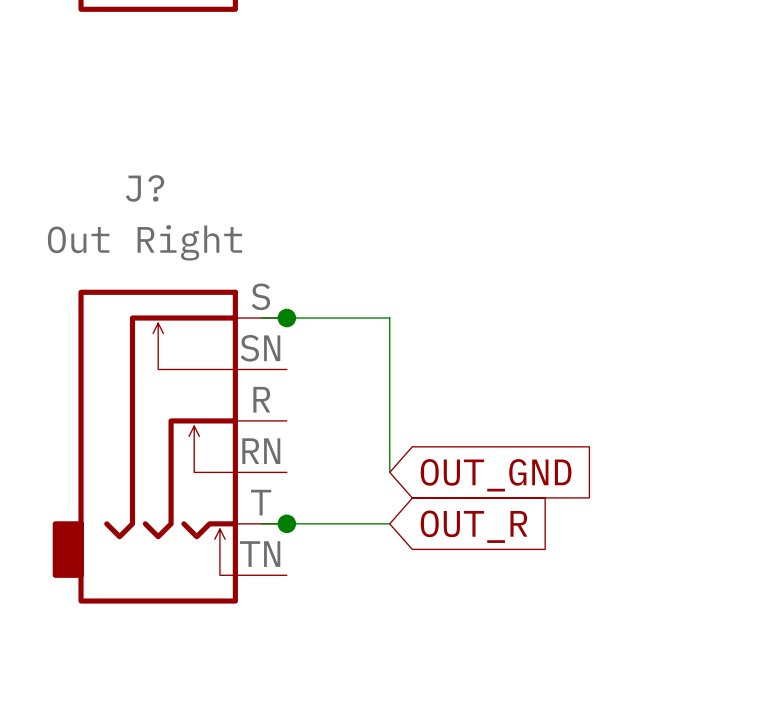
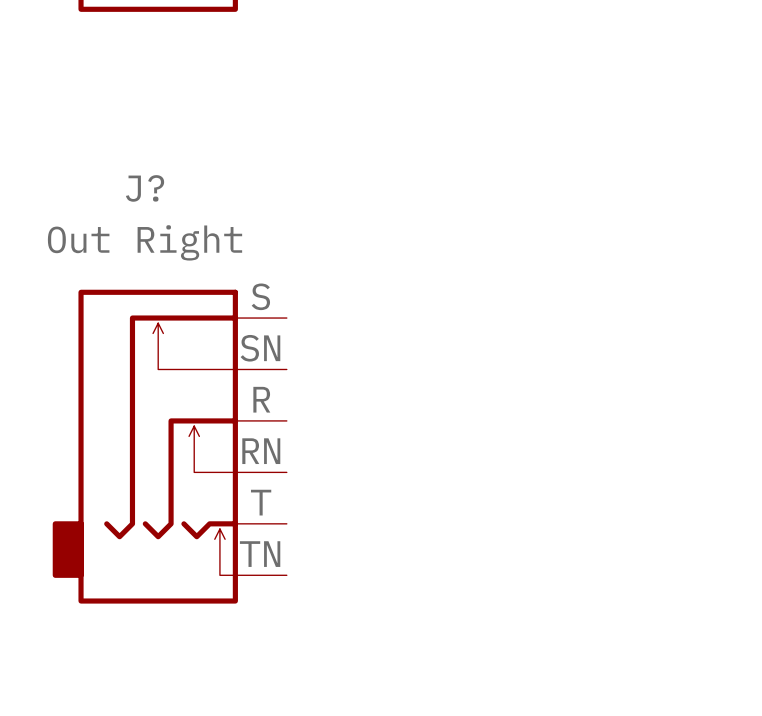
wire: (261, 318) (389, 318) (389, 472) -> none
junction: (286, 318) -> none
global label: OUT_GND (496, 475) -> none
wire: (261, 523) (389, 523) -> none
junction: (286, 523) -> none
global label: OUT_R (474, 526) -> none

